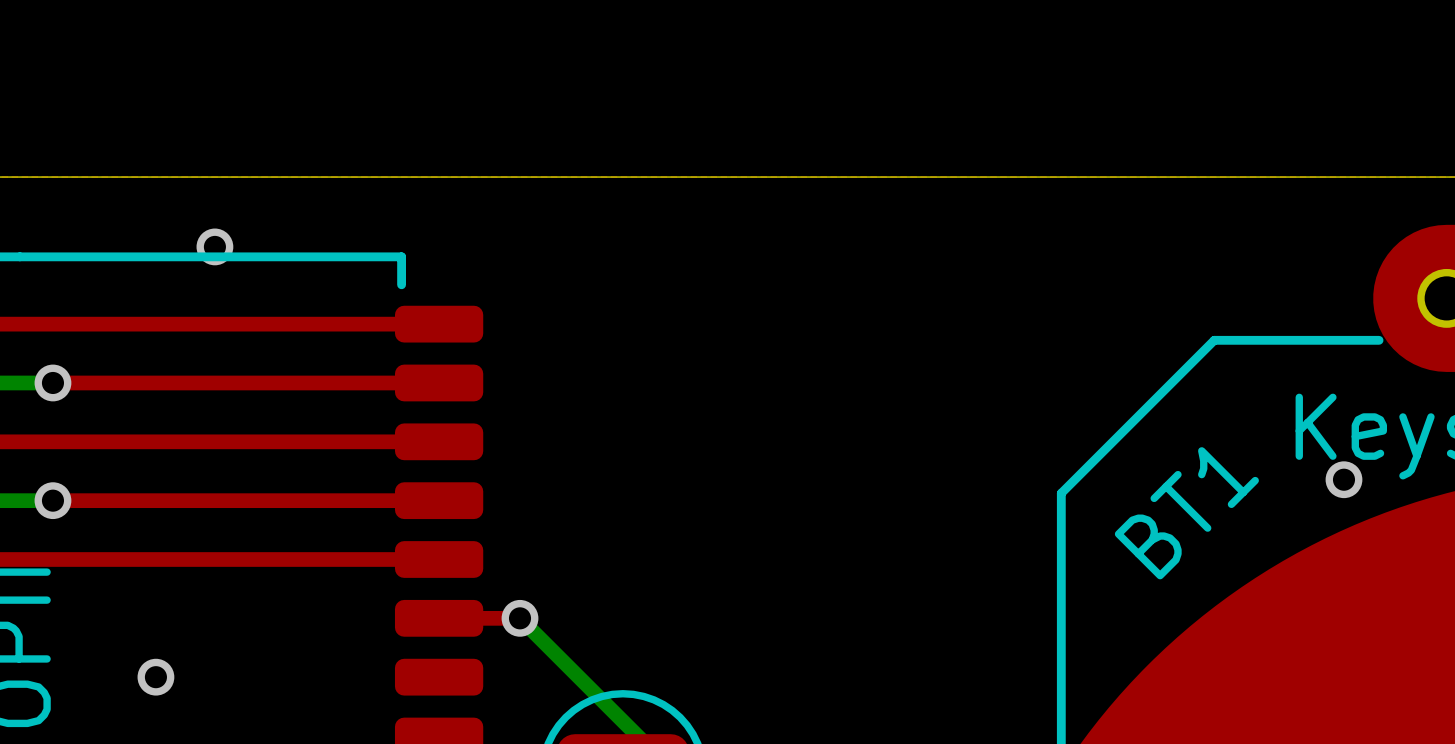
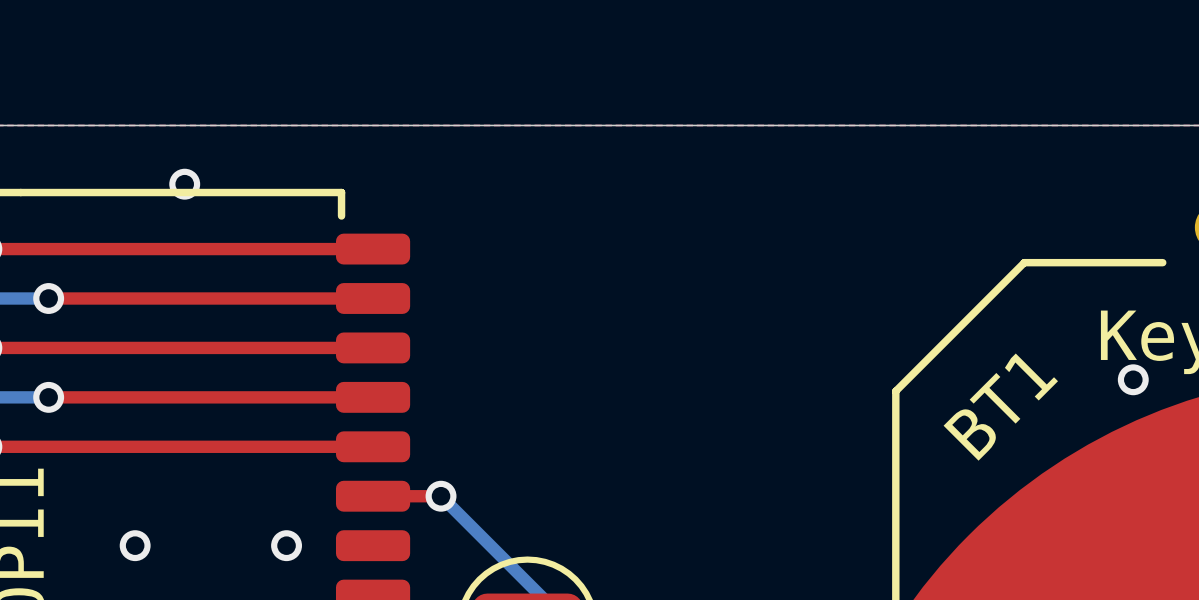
via: none -> (286, 545)

